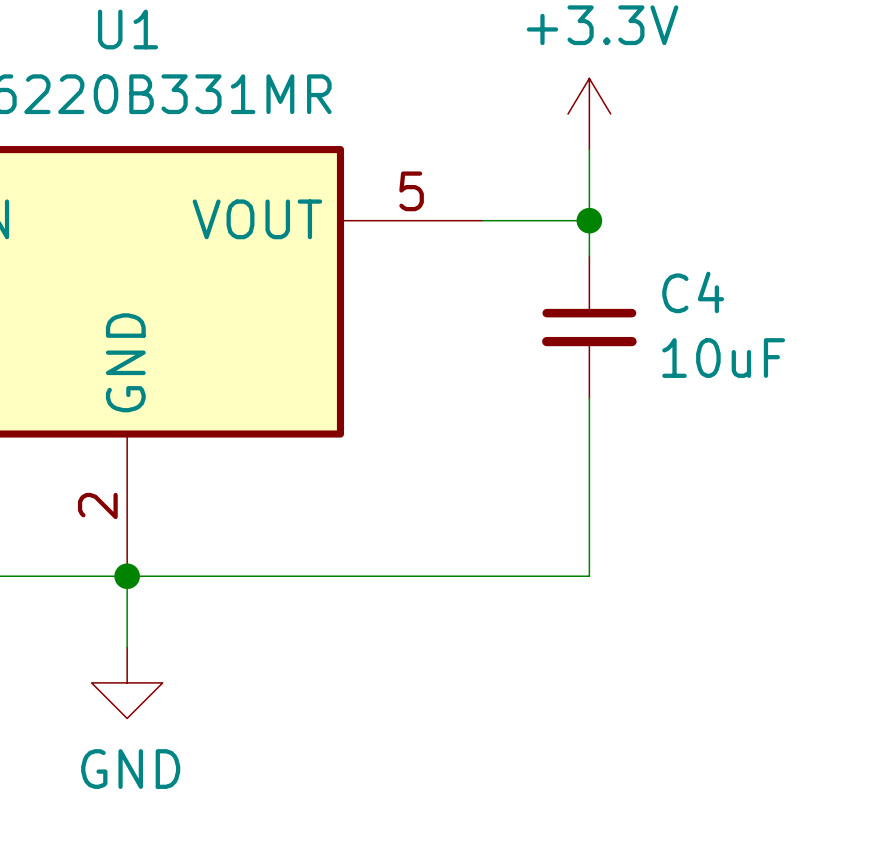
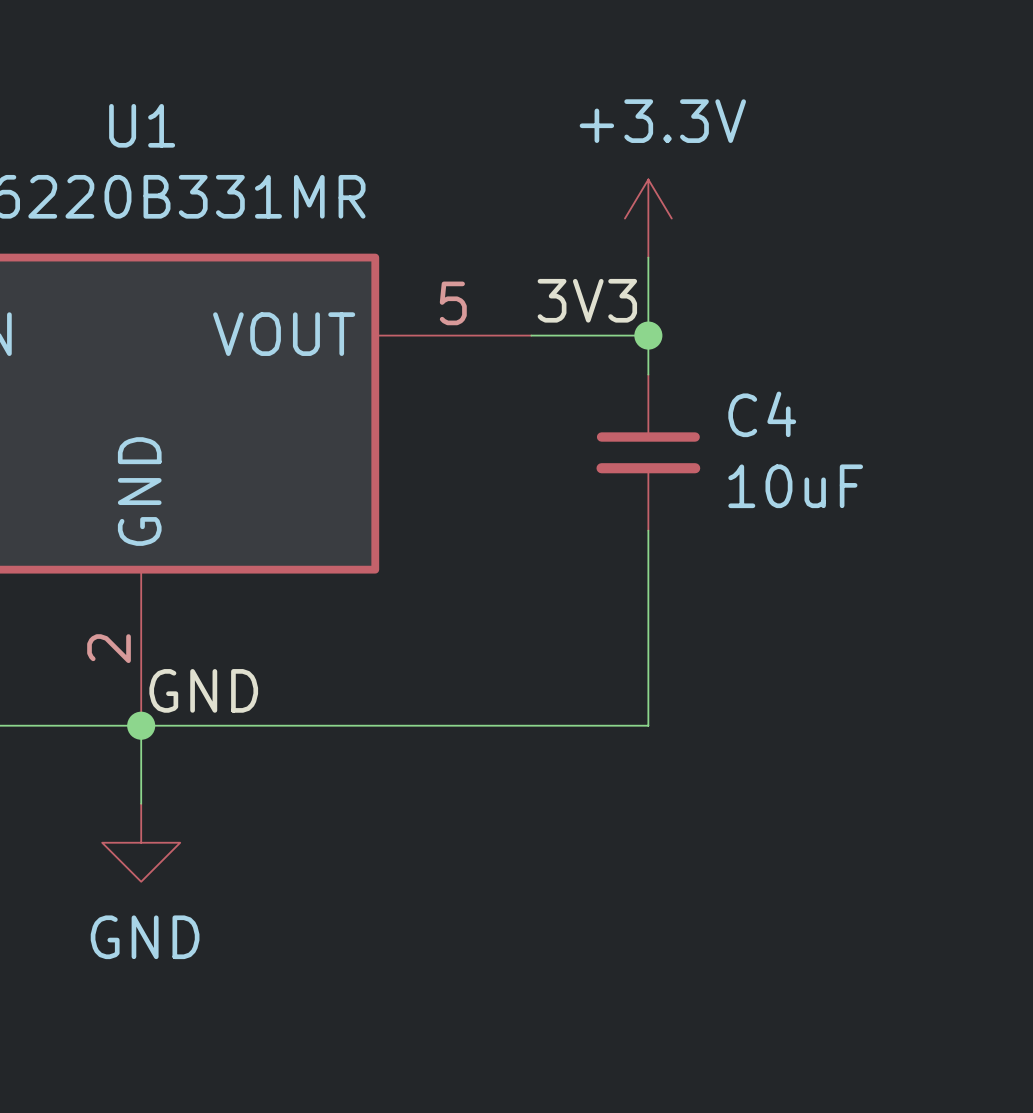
label: none -> 3V3 (587, 300)
label: none -> GND (203, 690)

